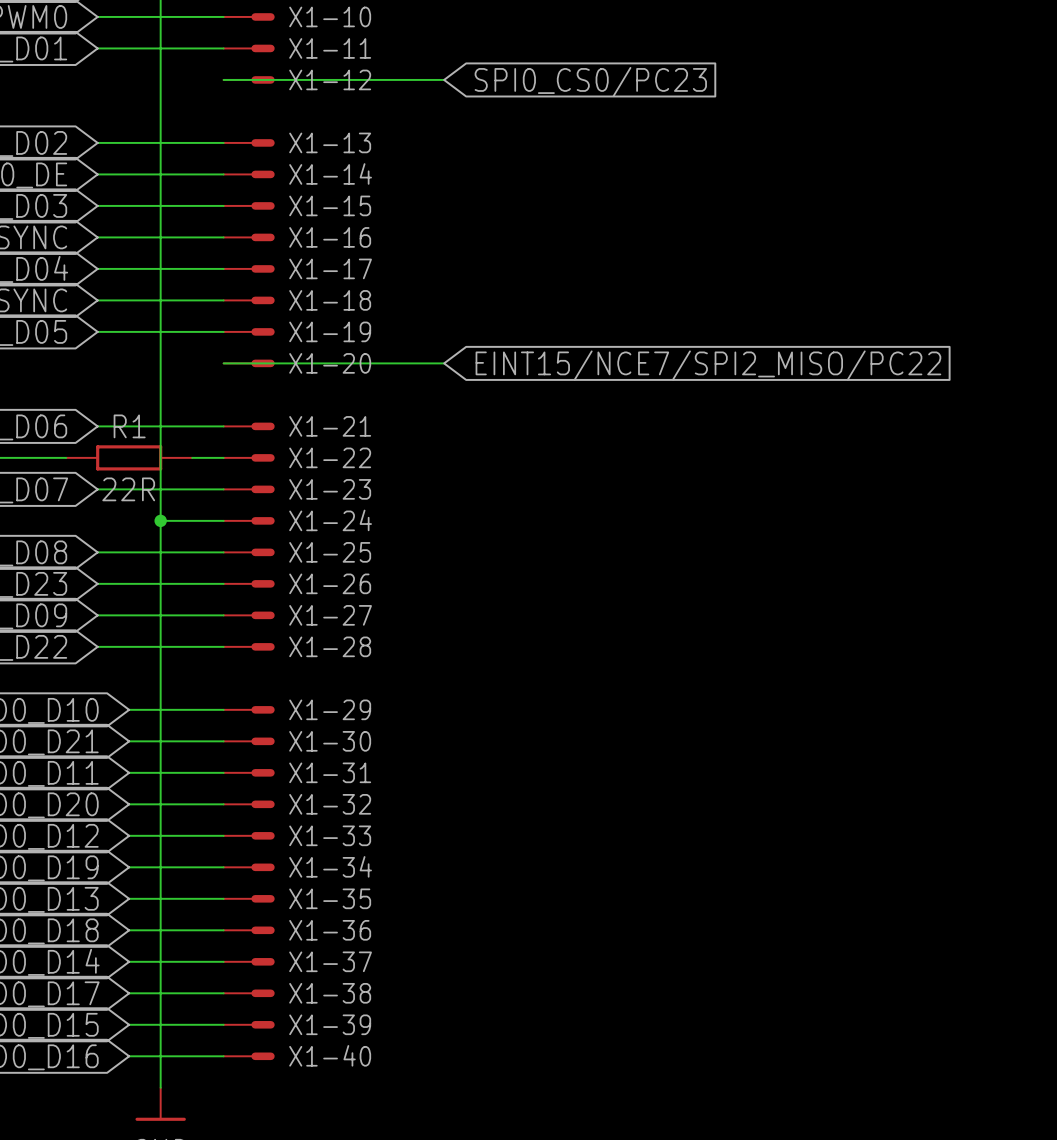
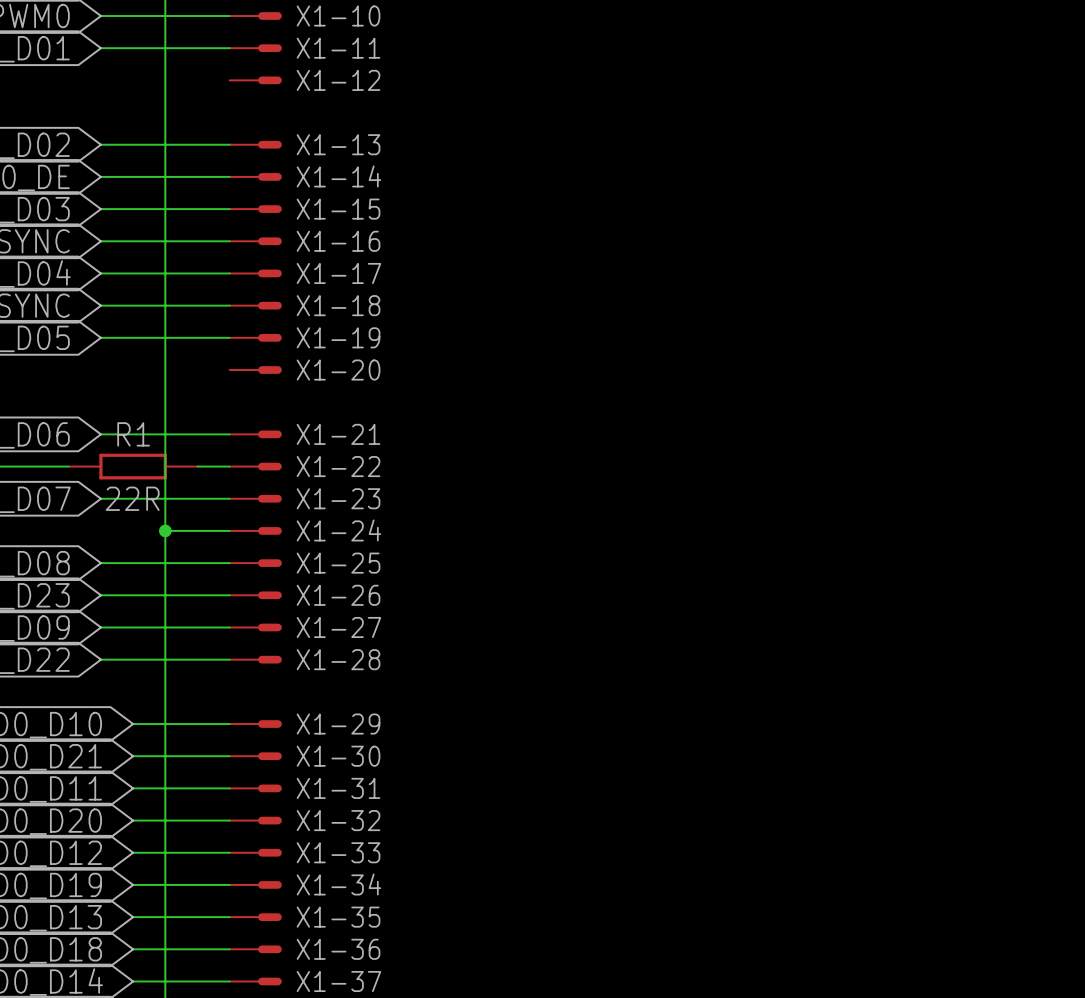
wire: (223, 79) (444, 79) -> none
global label: SPI0_CS0/PC23 (590, 82) -> none
wire: (223, 363) (444, 363) -> none
global label: EINT15/NCE7/SPI2_MISO/PC22 (708, 365) -> none

